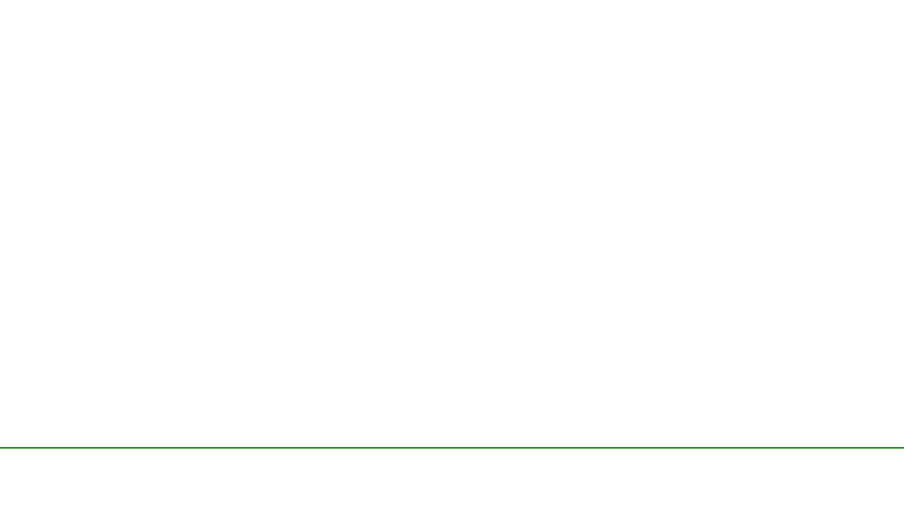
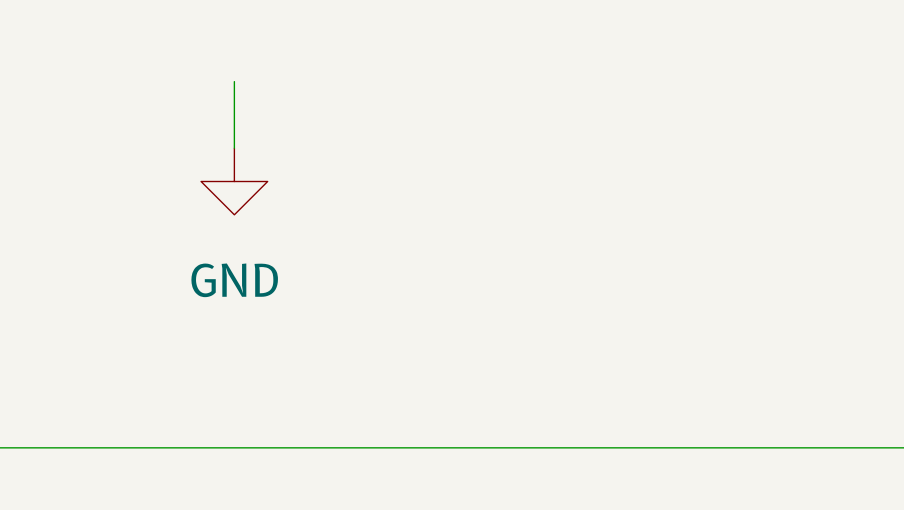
wire: none -> (234, 81) (234, 148)
power symbol: none -> GND (234, 181)

